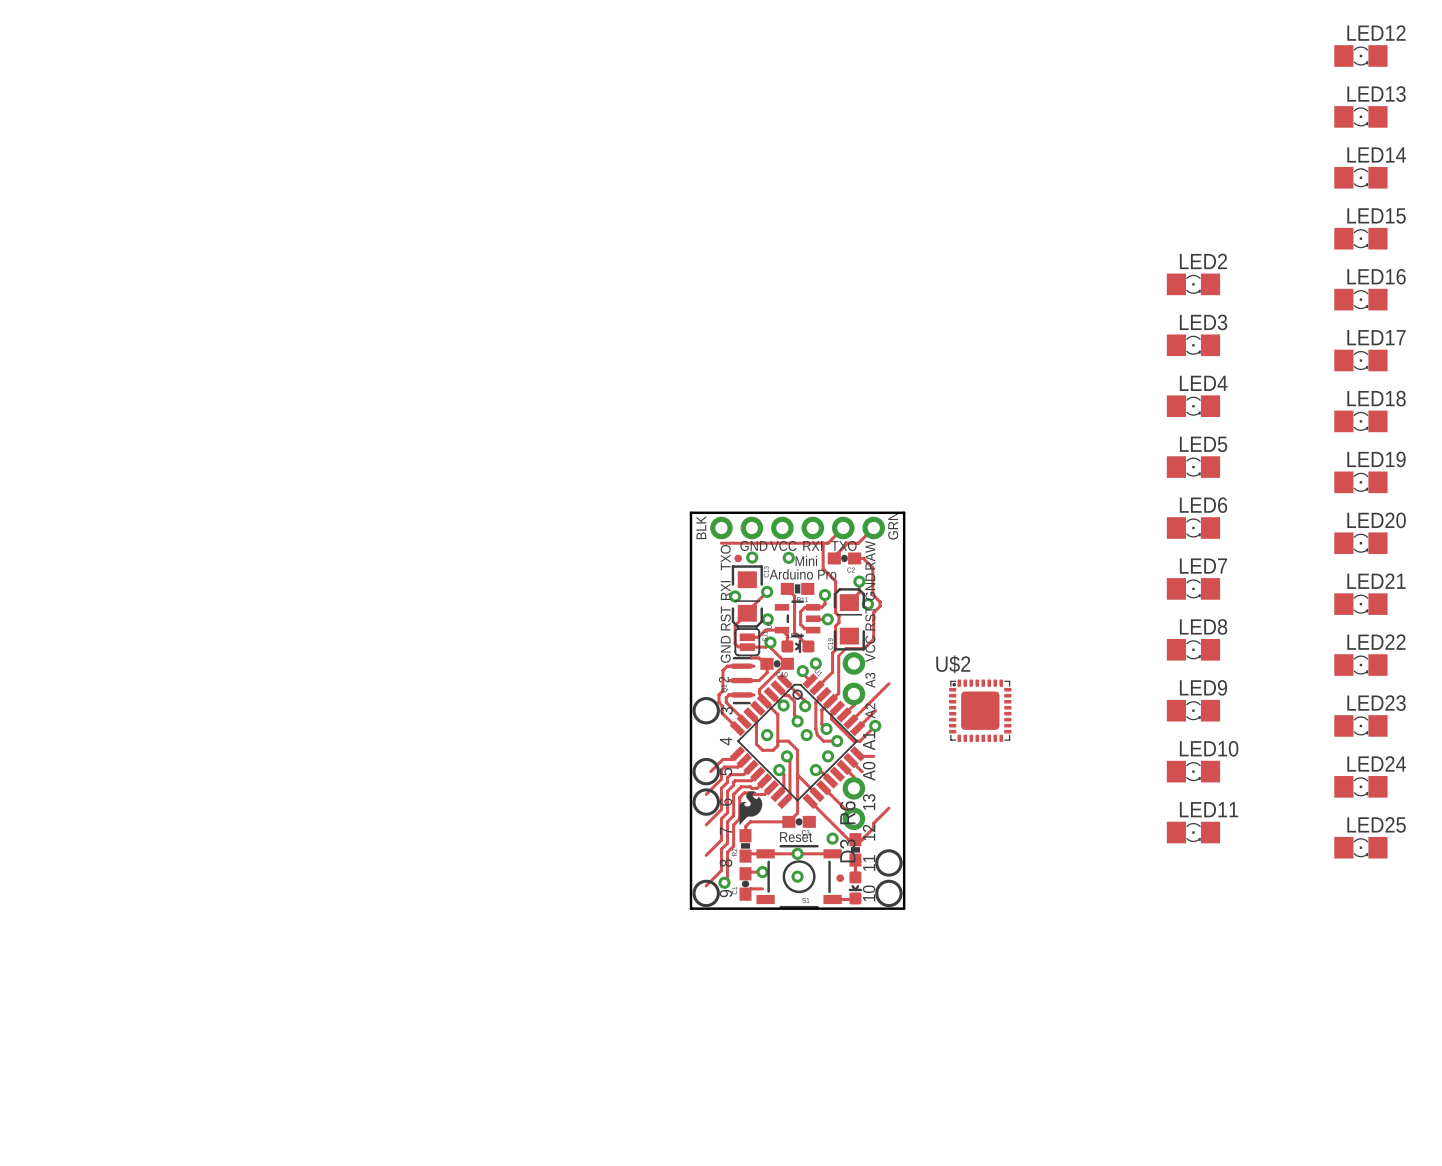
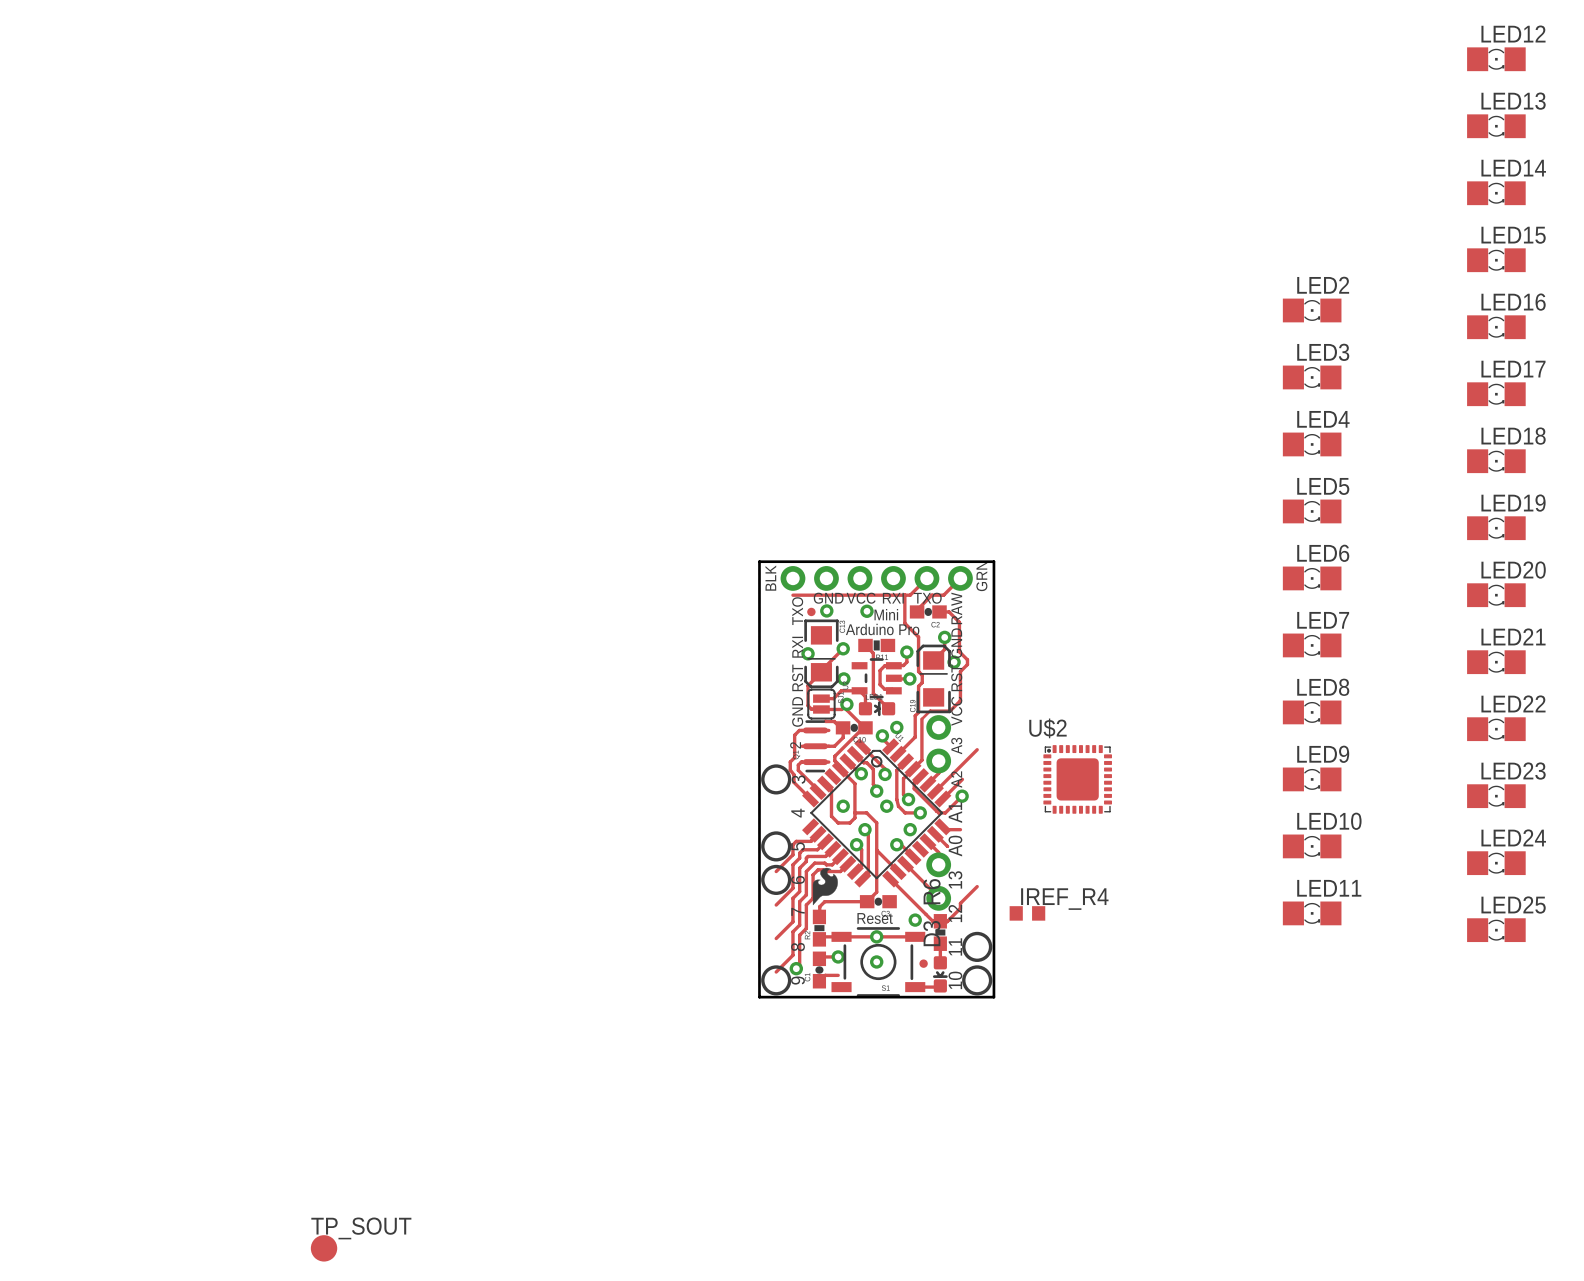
track: (737, 753) (731, 759) (722, 759) (710, 771) -> none
IREF_R4: none -> (1027, 913)
TP_SOUT: none -> (324, 1248)

